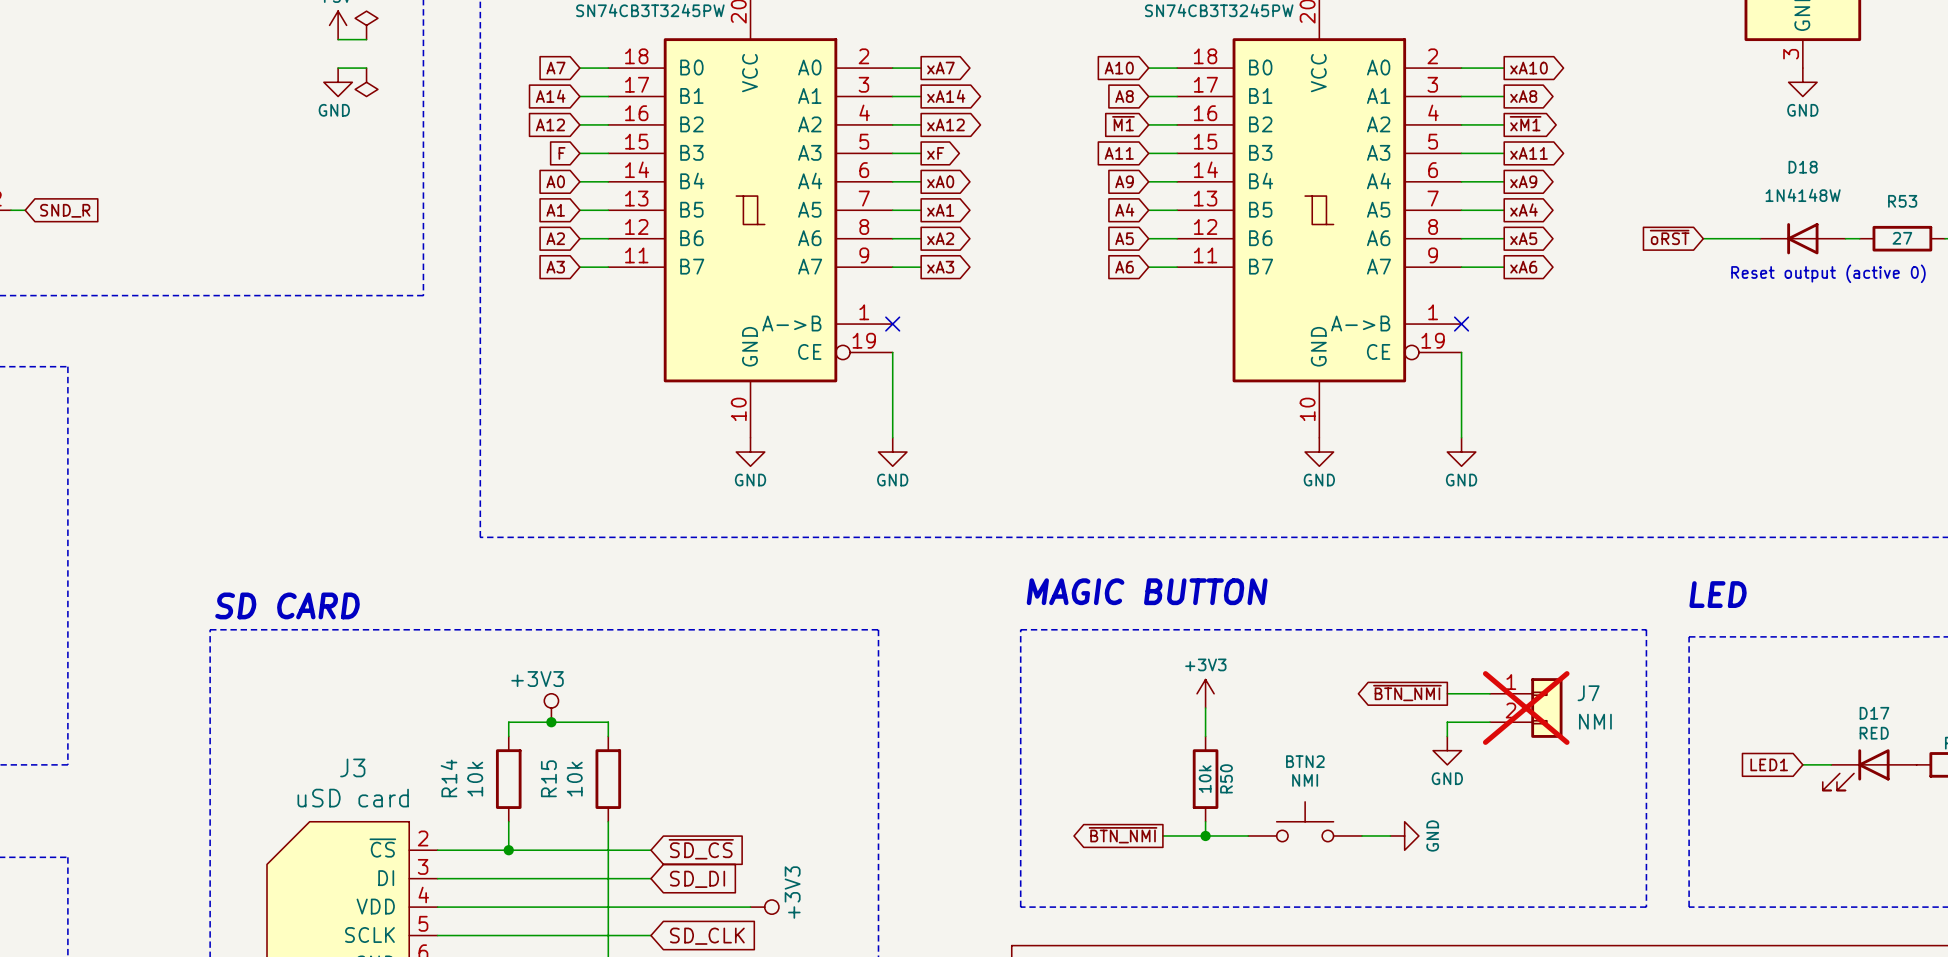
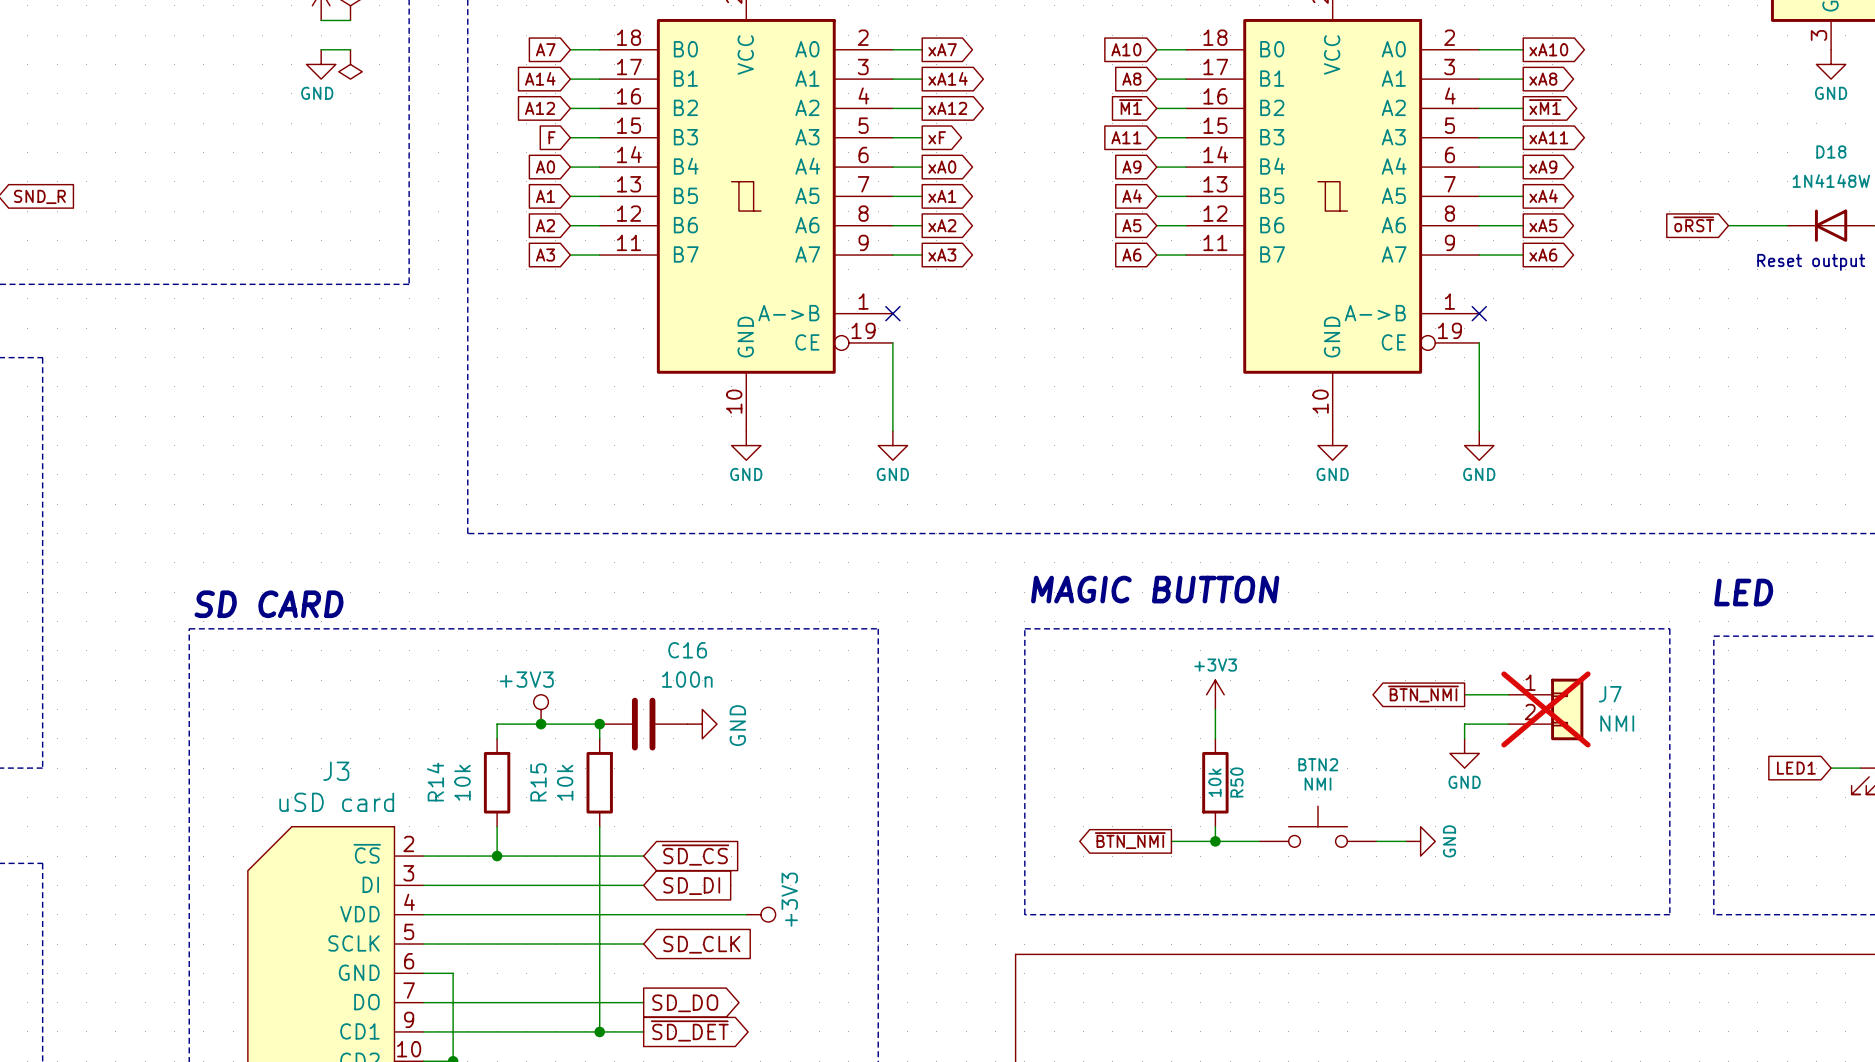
junction: none -> (599, 724)
C16: none -> 100n (643, 724)
power symbol: none -> GND (702, 724)

